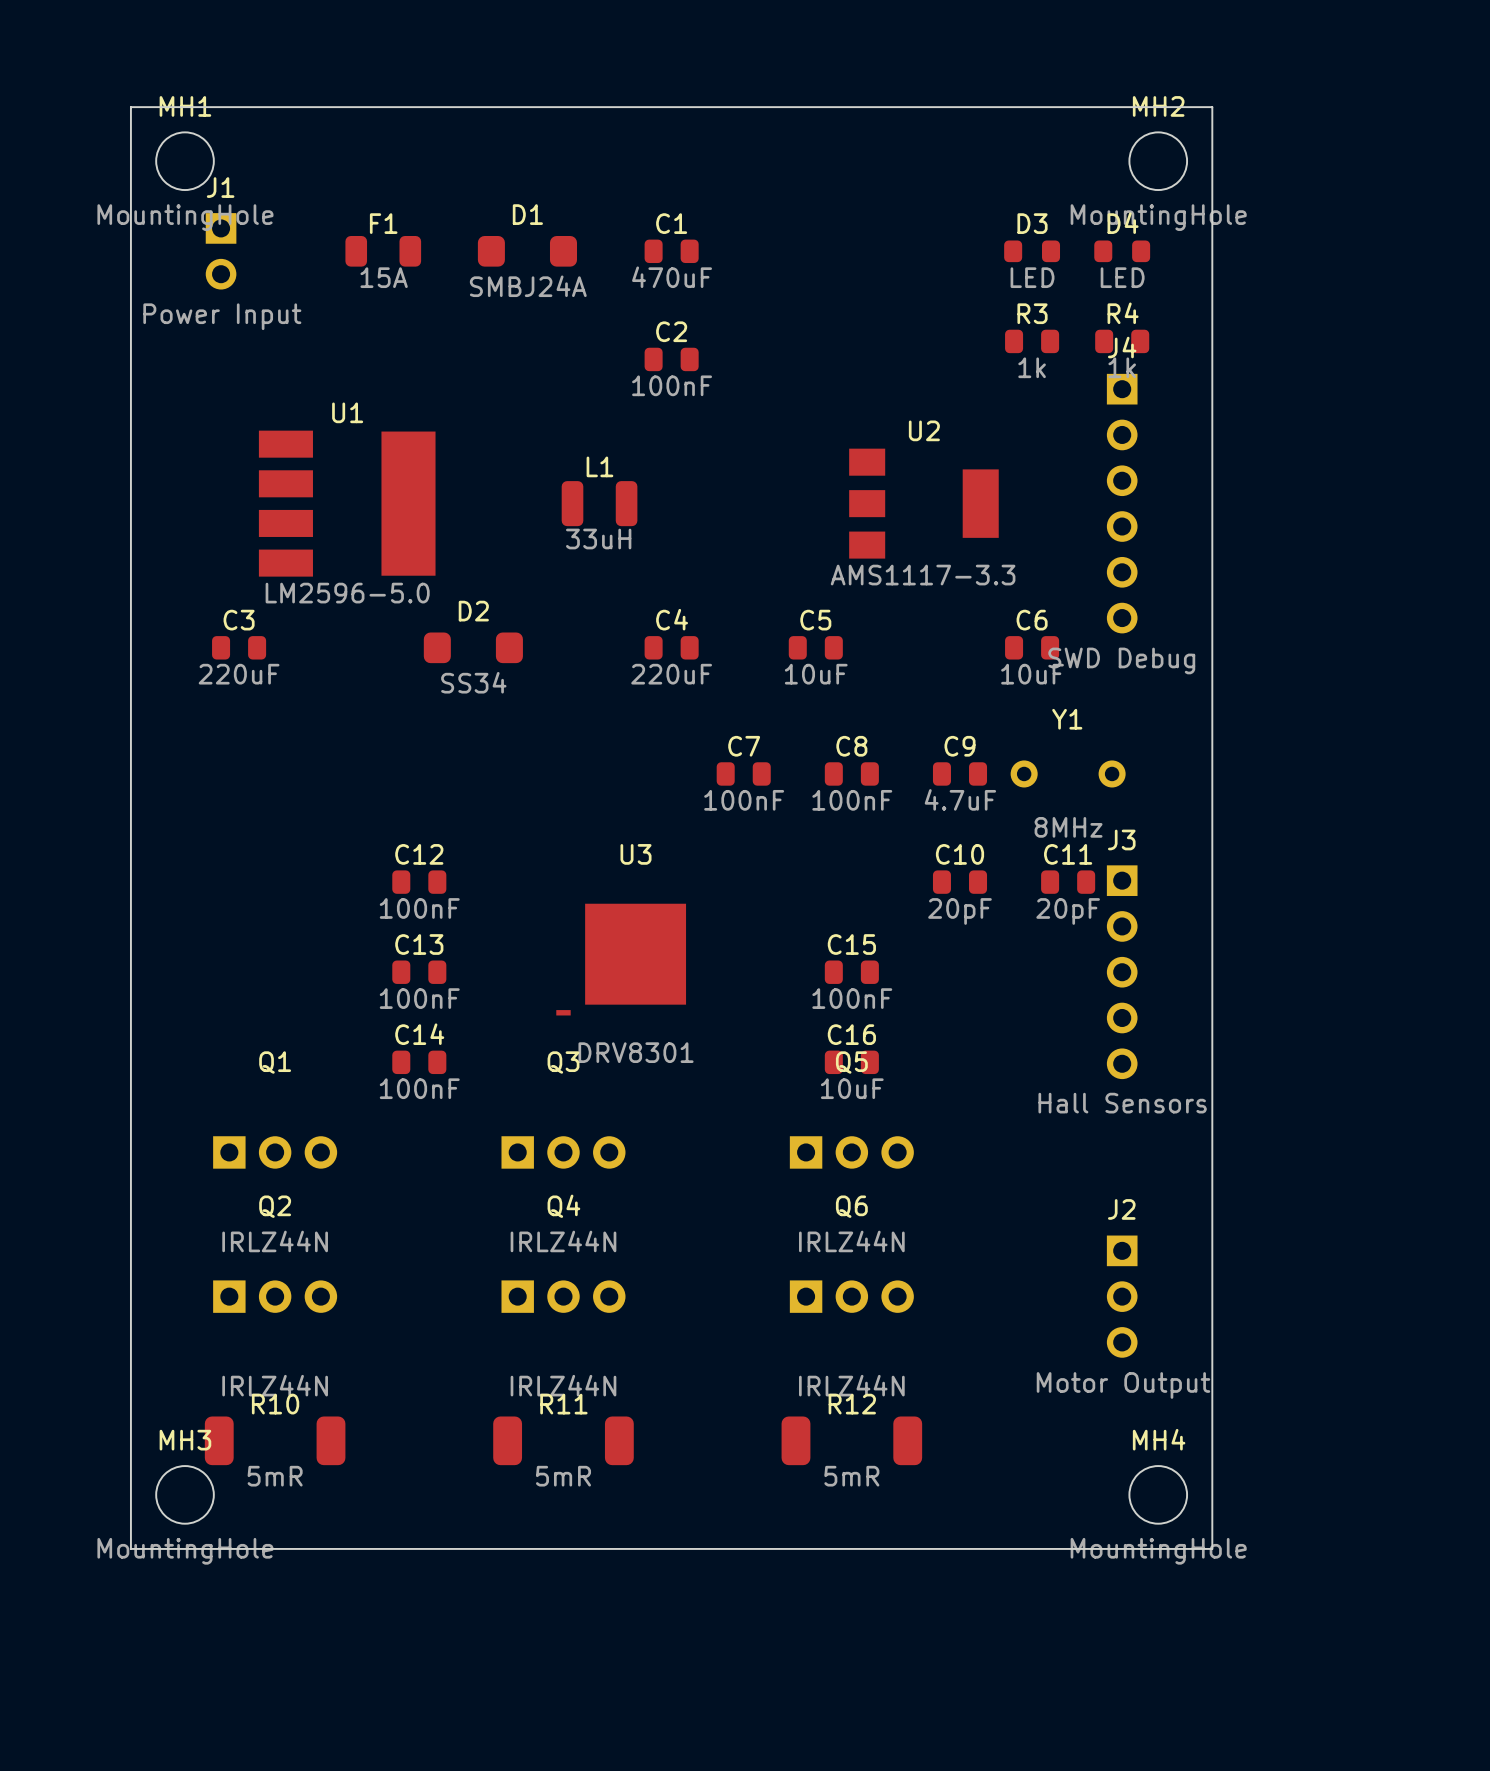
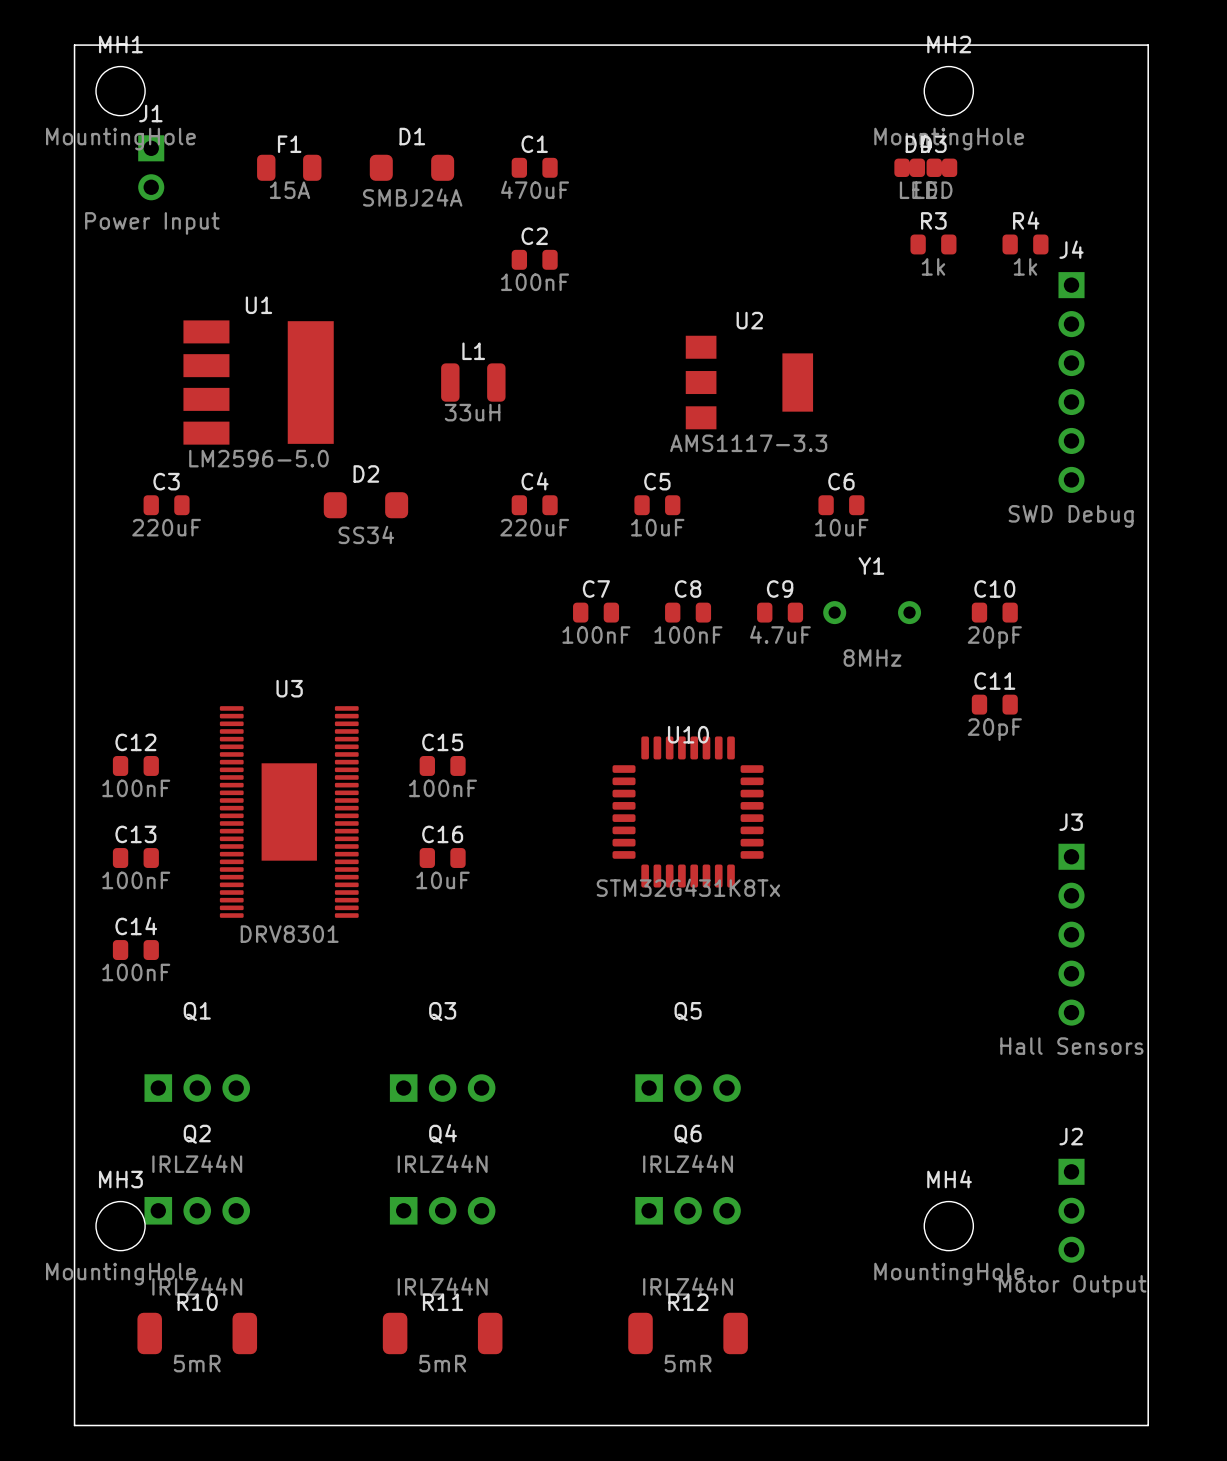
board edge: (1212, 107) (1212, 1548) (130, 1548) -> (994, 45) (1148, 45) (1148, 1425) (74, 1425) (74, 1272)
D3 position: (1032, 251) -> (933, 167)
R3 position: (1032, 341) -> (933, 244)
R4 position: (1122, 341) -> (1025, 244)
J4 position: (1122, 503) -> (1071, 382)
U3 name position: U3 (636, 854) -> U3 (289, 688)
C12 position: (419, 882) -> (135, 765)
C10 position: (959, 882) -> (994, 612)
C11 position: (1068, 882) -> (994, 704)
U3 footprint: [556, 903, 687, 1016] -> [219, 706, 359, 918]
C13 position: (419, 972) -> (135, 858)
C15 position: (851, 972) -> (442, 765)
J3 position: (1122, 972) -> (1071, 934)
U10: none -> STM32G431K8Tx (688, 811)
U3 value position: DRV8301 (636, 1052) -> DRV8301 (289, 934)
C14 position: (419, 1062) -> (135, 950)
C16 position: (851, 1062) -> (442, 858)
Q1 position: (275, 1152) -> (197, 1088)
Q3 position: (563, 1152) -> (442, 1088)
Q5 position: (851, 1152) -> (688, 1088)
Q2 position: (275, 1296) -> (197, 1210)
Q4 position: (563, 1296) -> (442, 1210)
Q6 position: (851, 1296) -> (688, 1210)
J2 position: (1122, 1296) -> (1071, 1210)
R10 position: (275, 1440) -> (197, 1333)
R11 position: (563, 1440) -> (442, 1333)
R12 position: (851, 1440) -> (688, 1333)

